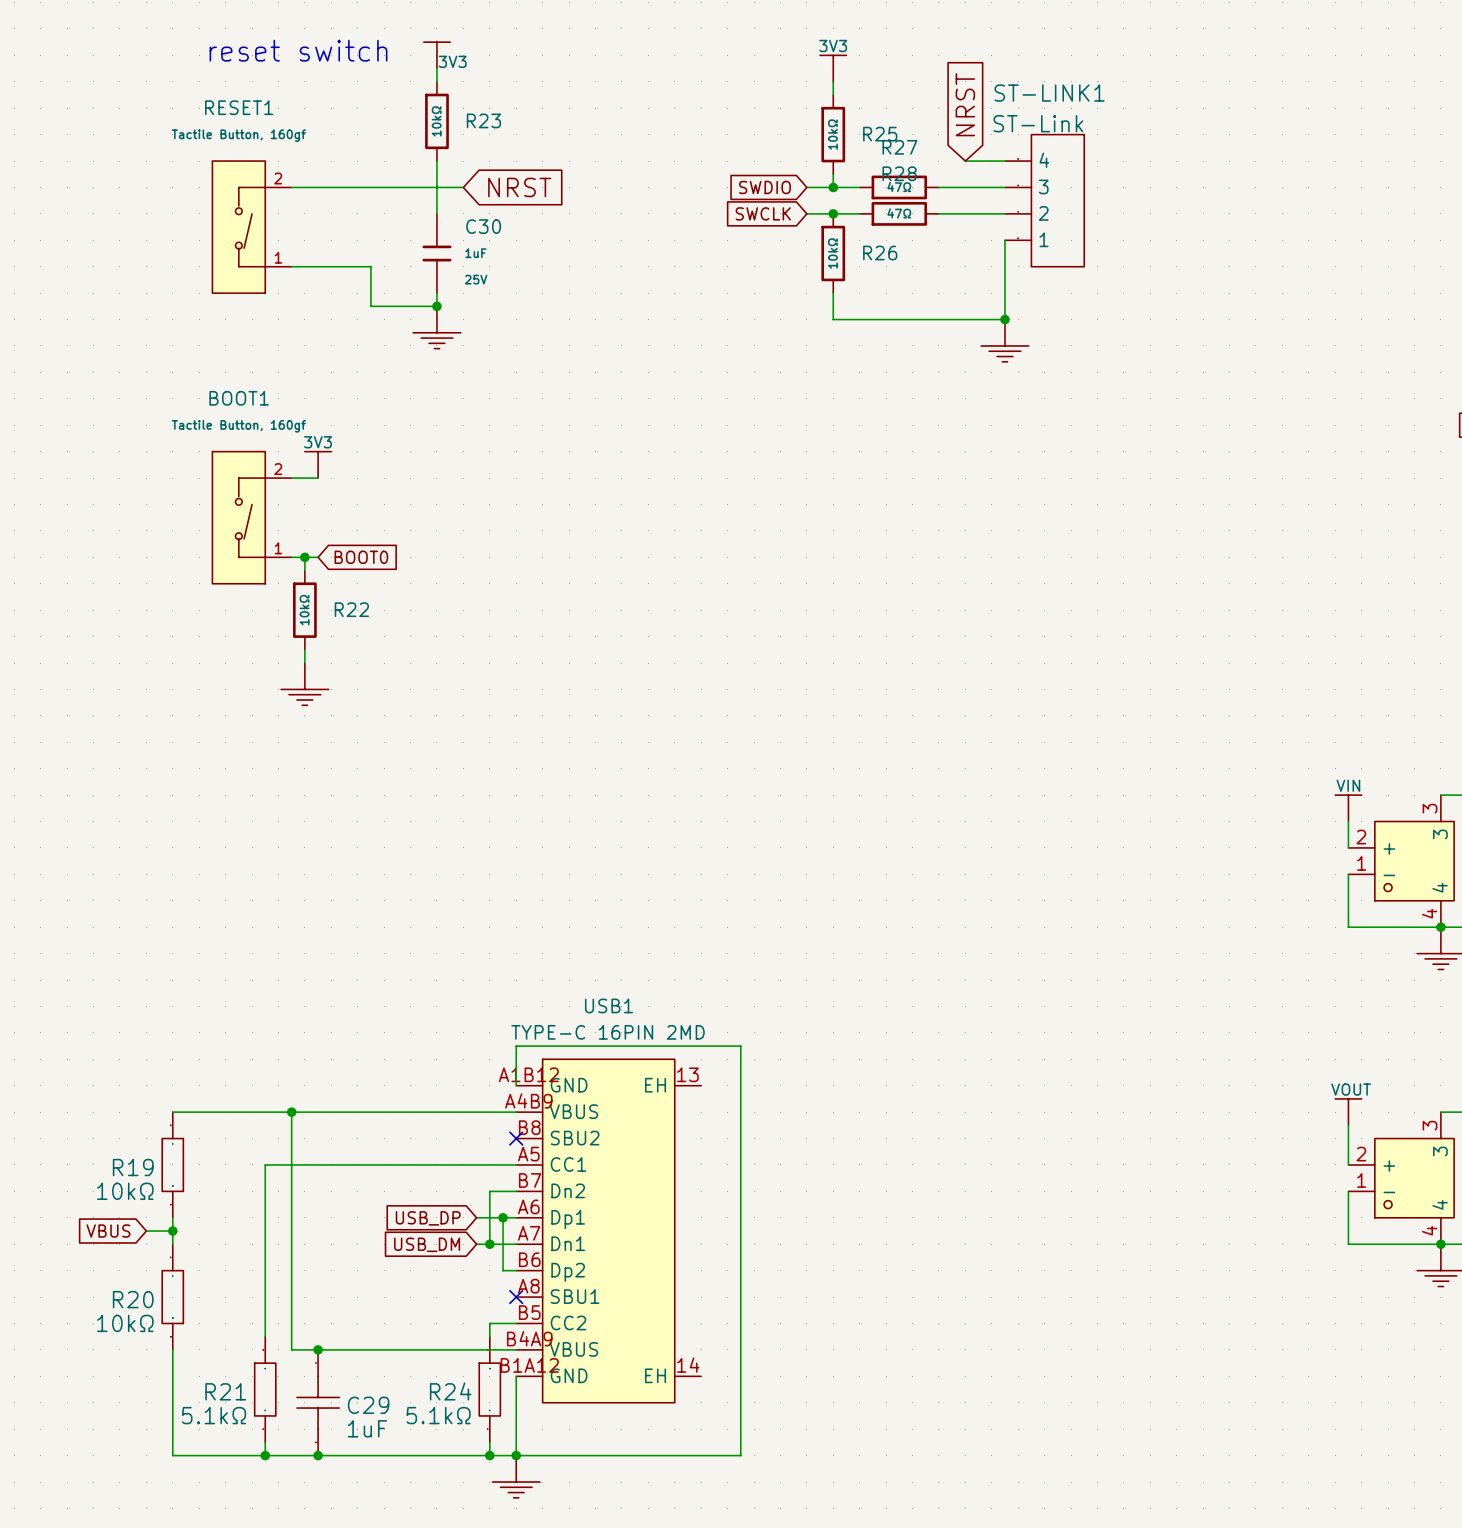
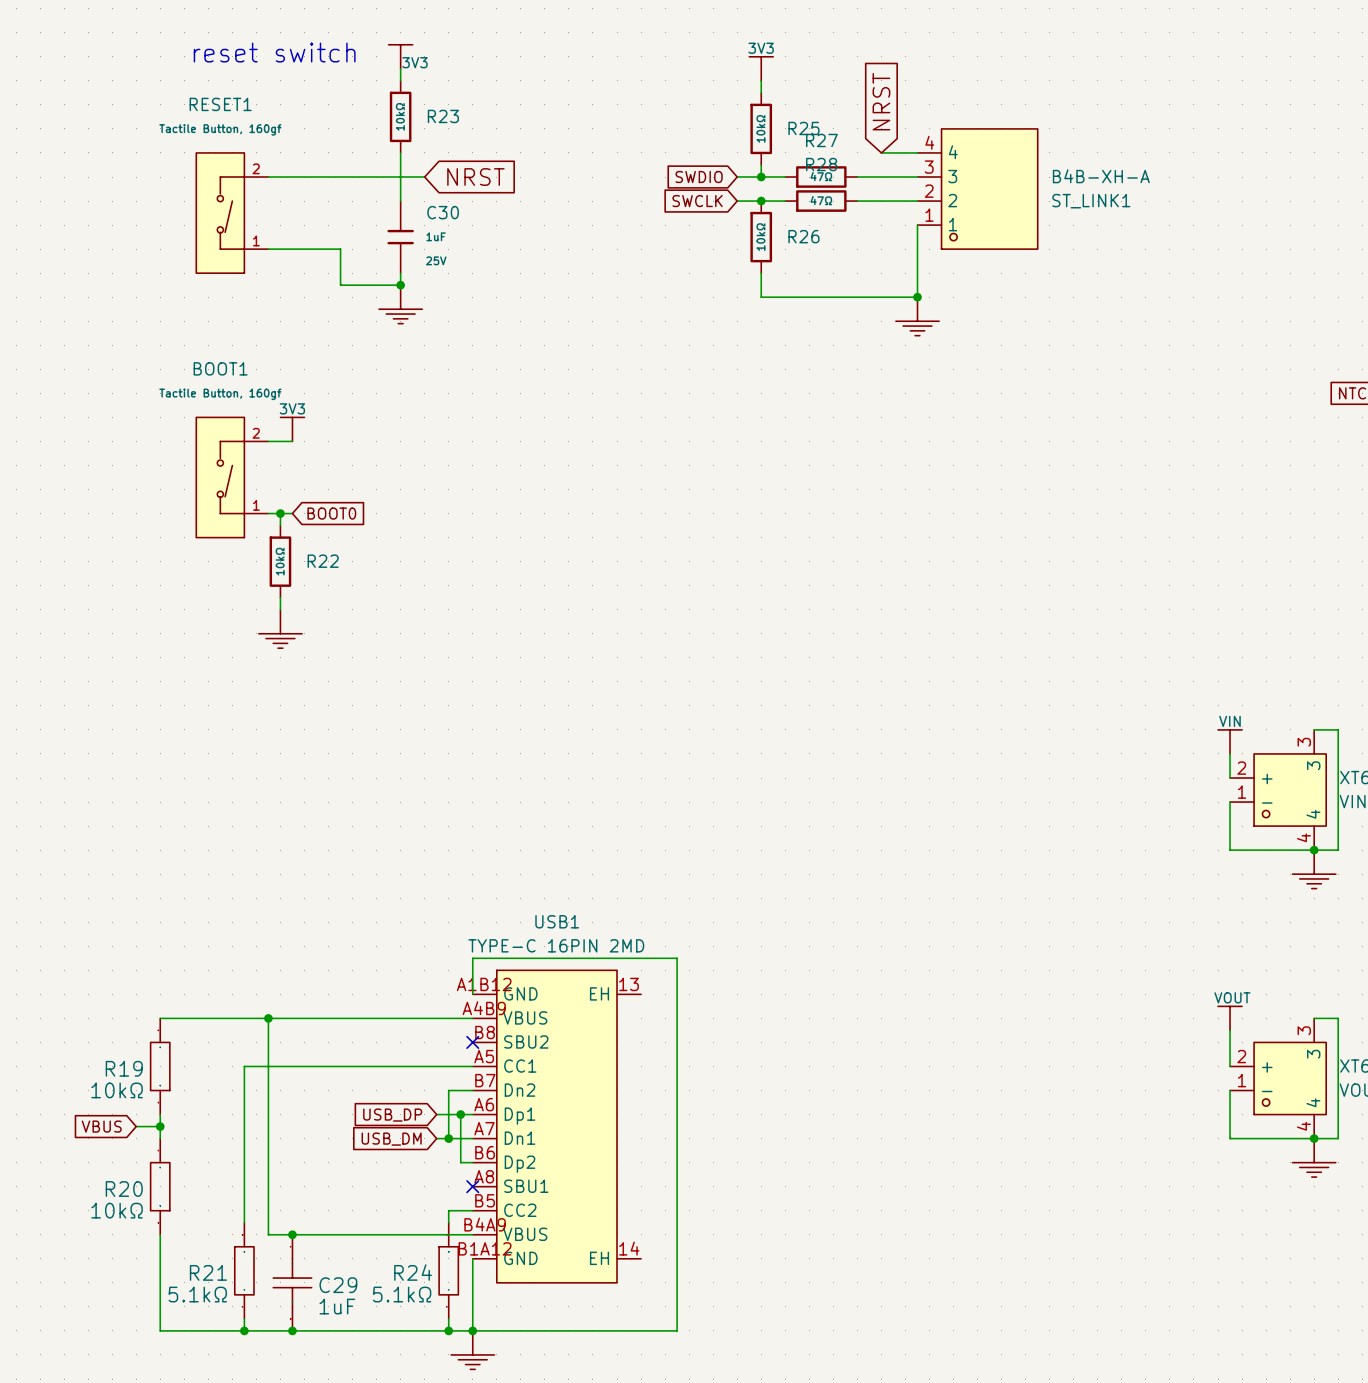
ST-LINK1: ST-Link (1044, 200) -> none
ST_LINK1: none -> B4B-XH-A (977, 189)

